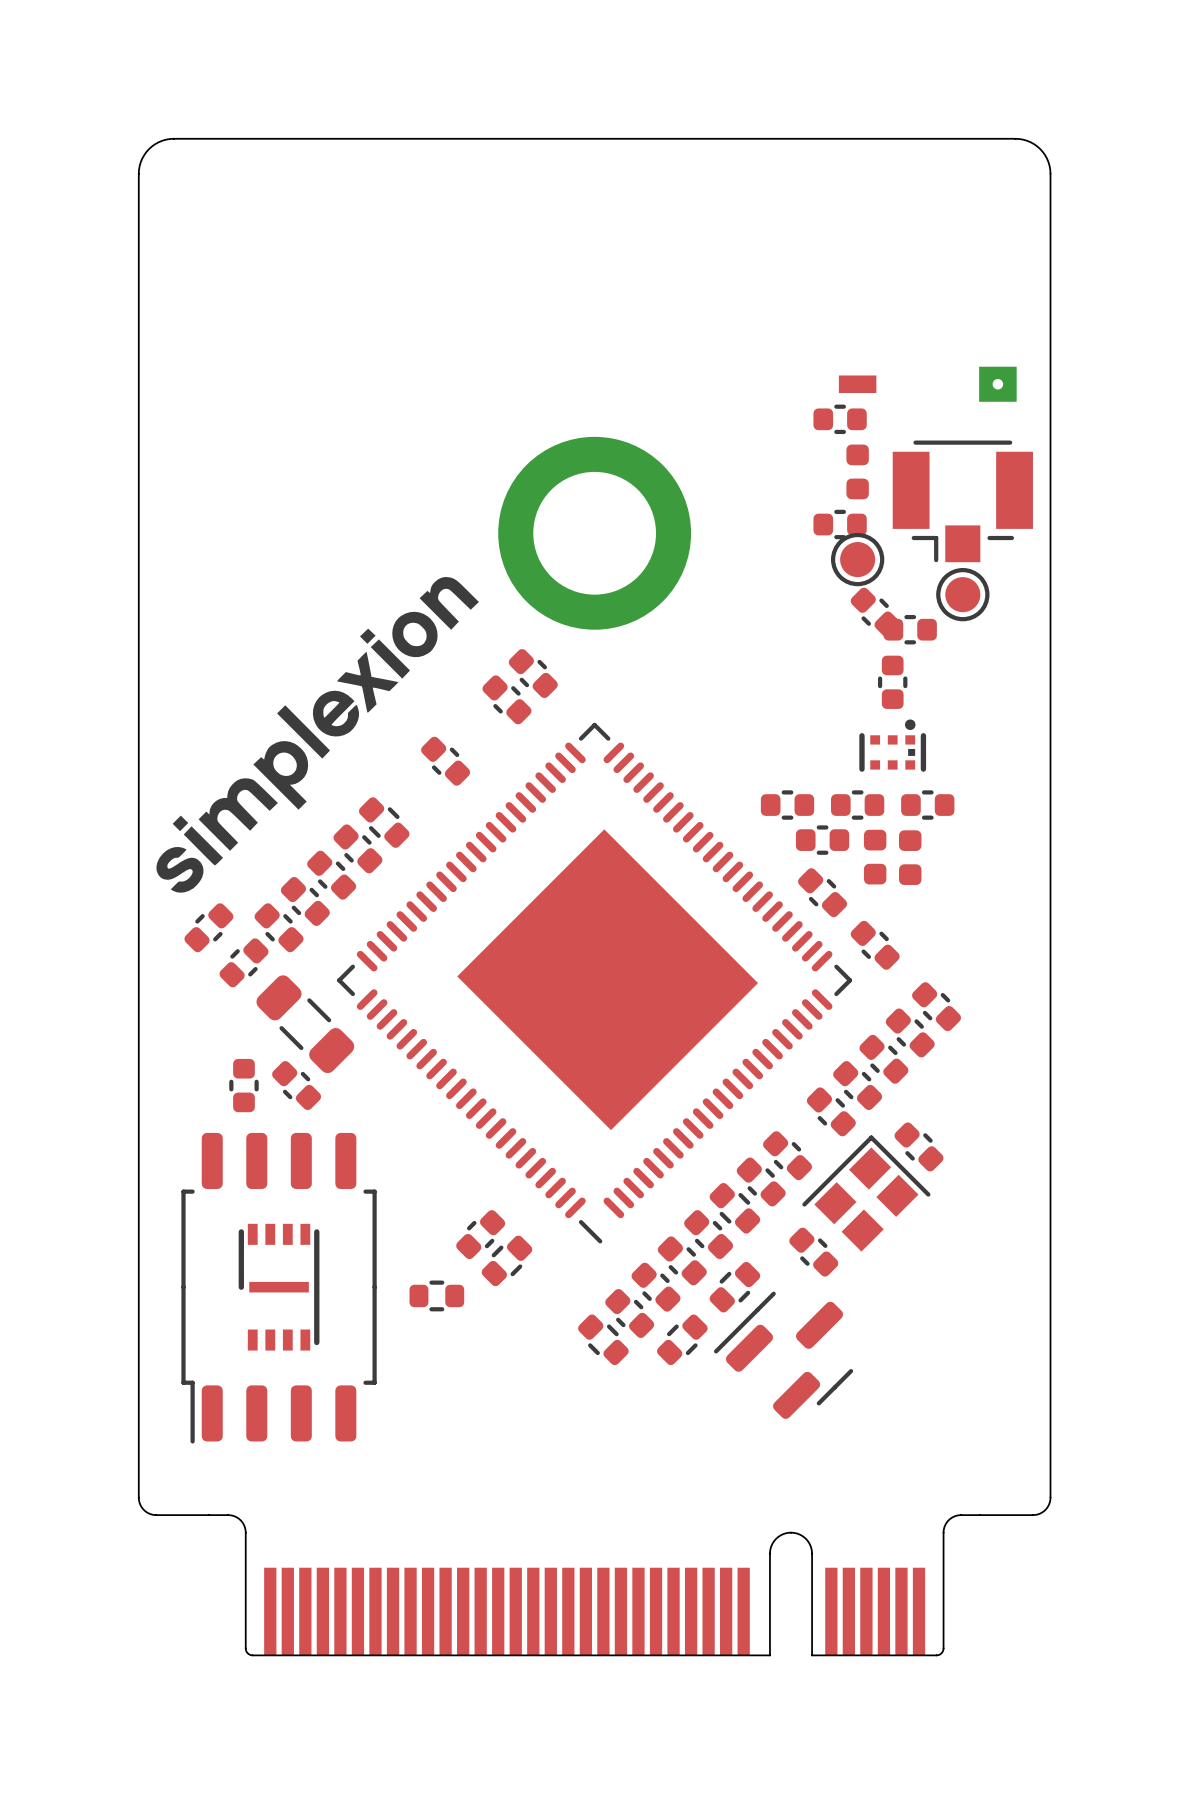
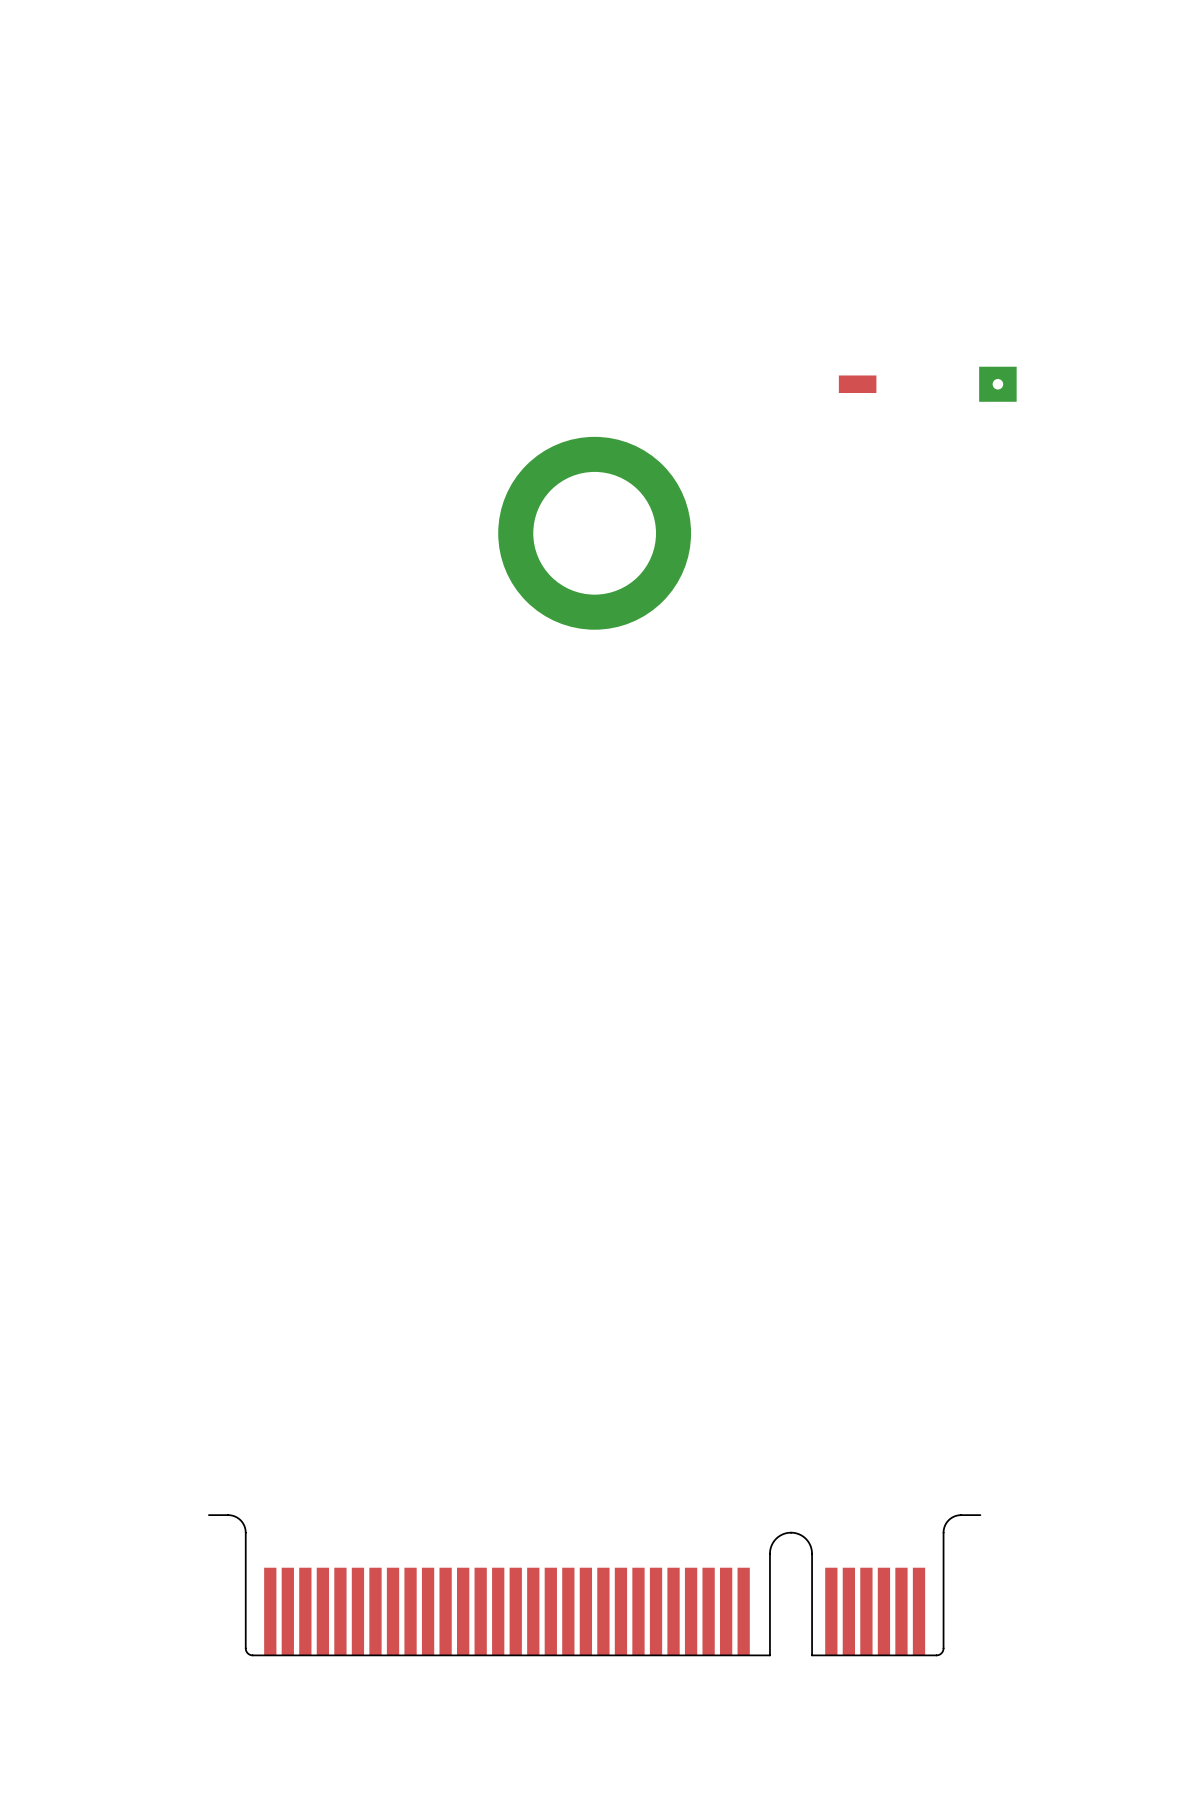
part: (840, 419) -> none
part: (857, 471) -> none
part: (962, 501) -> none
part: (840, 524) -> none
part: (857, 559) -> none
drawing: [156, 576, 479, 893] -> none
part: (962, 594) -> none
part: (875, 612) -> none
part: (910, 629) -> none
part: (533, 673) -> none
part: (892, 682) -> none
part: (506, 699) -> none
part: (892, 745) -> none
part: (445, 761) -> none
part: (787, 805) -> none
part: (857, 805) -> none
part: (927, 805) -> none
part: (384, 822) -> none
part: (822, 840) -> none
part: (357, 848) -> none
part: (875, 857) -> none
part: (910, 857) -> none
part: (331, 875) -> none
part: (822, 892) -> none
part: (305, 901) -> none
part: (208, 927) -> none
part: (279, 927) -> none
part: (875, 945) -> none
part: (243, 962) -> none
part: (594, 983) -> none
part: (936, 1006) -> none
part: (305, 1024) -> none
part: (910, 1032) -> none
part: (883, 1059) -> none
part: (243, 1085) -> none
part: (296, 1085) -> none
part: (857, 1085) -> none
part: (831, 1111) -> none
part: (919, 1146) -> none
part: (787, 1155) -> none
part: (761, 1181) -> none
part: (866, 1193) -> none
part: (734, 1208) -> none
part: (480, 1234) -> none
part: (708, 1234) -> none
part: (813, 1252) -> none
part: (506, 1260) -> none
part: (682, 1260) -> none
part: (279, 1287) -> none
part: (656, 1287) -> none
part: (734, 1287) -> none
part: (279, 1288) -> none
part: (436, 1295) -> none
part: (629, 1313) -> none
part: (603, 1339) -> none
part: (682, 1339) -> none
part: (783, 1355) -> none
board edge: (208, 1515) (152, 1514) (142, 1508) (138, 1497) (138, 173) (142, 158) (149, 149) (158, 142) (173, 138) (1015, 138) (1030, 142) (1045, 155) (1050, 173) (1050, 1497) (1046, 1508) (1037, 1514) (980, 1515) -> none

